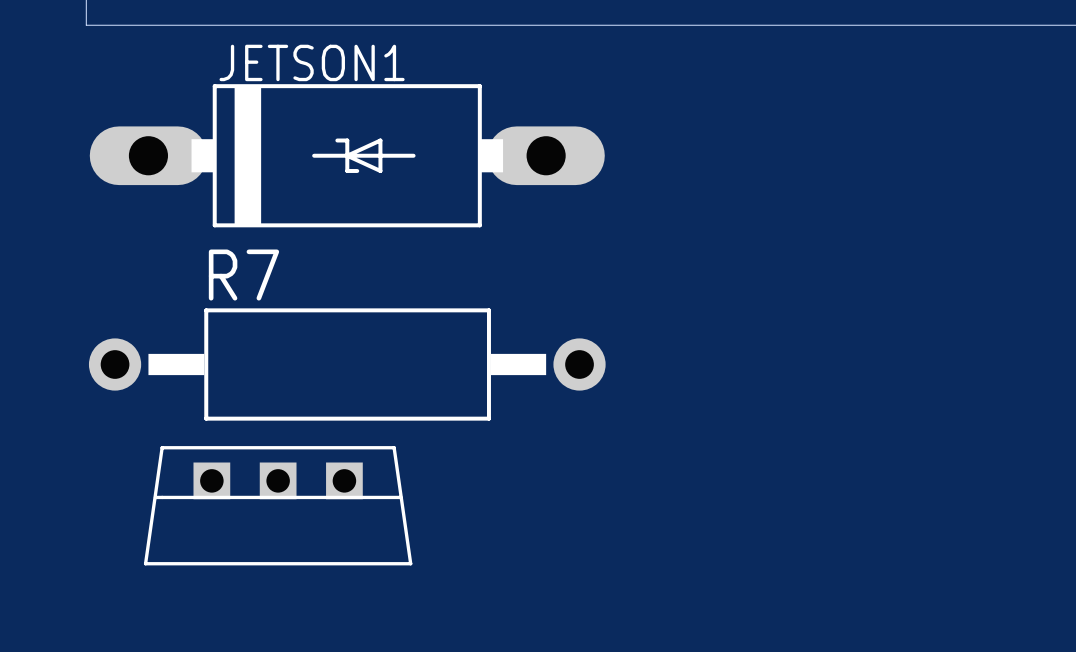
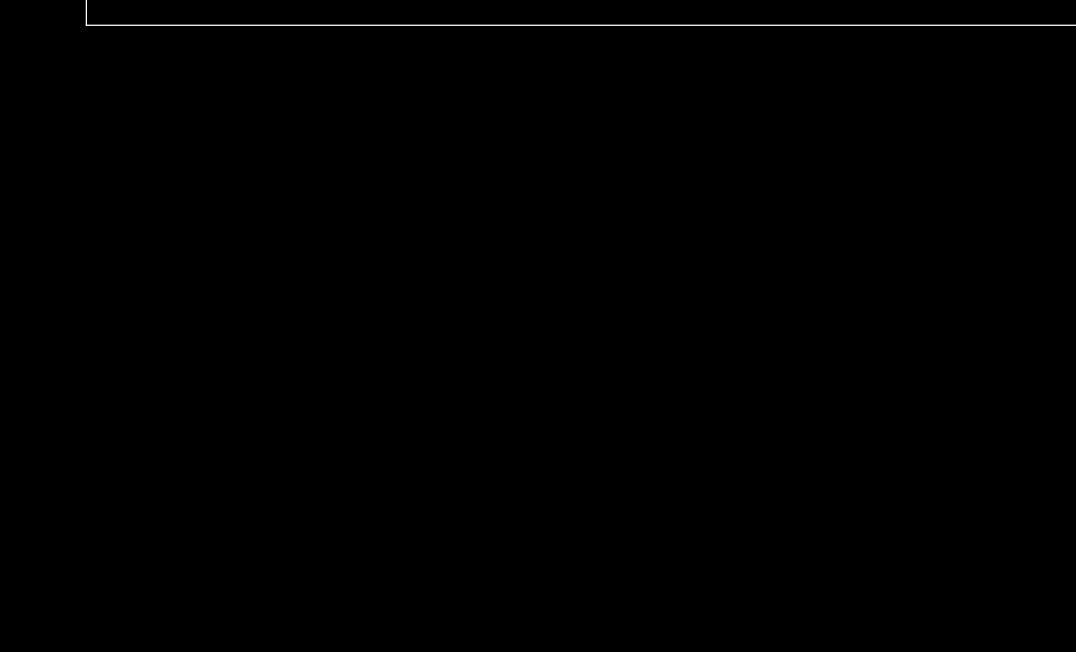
JETSON1: (347, 155) -> none
R7: (347, 364) -> none
part: (278, 505) -> none

